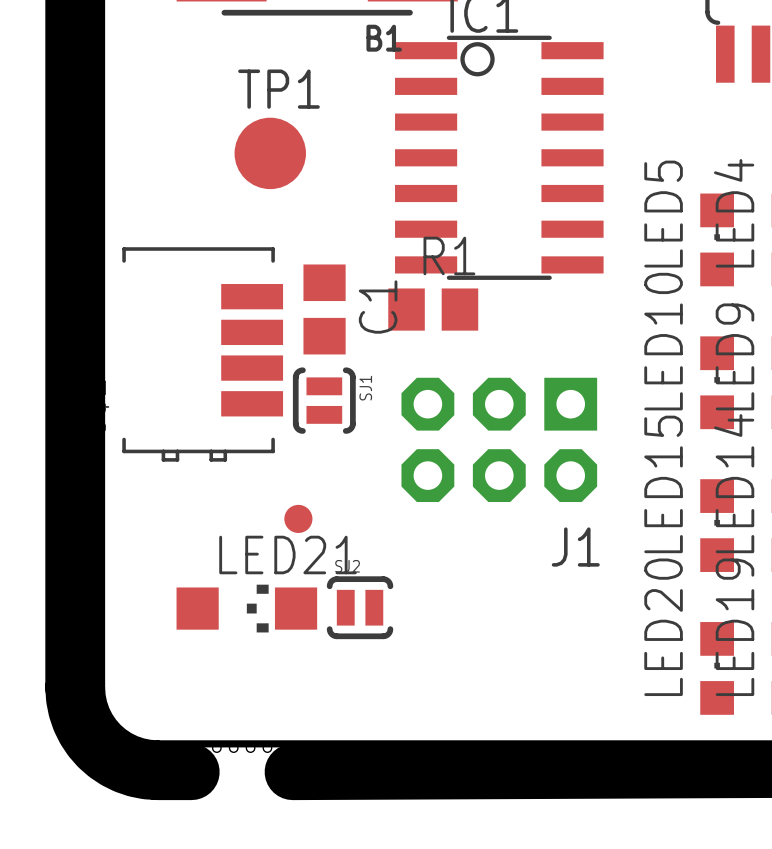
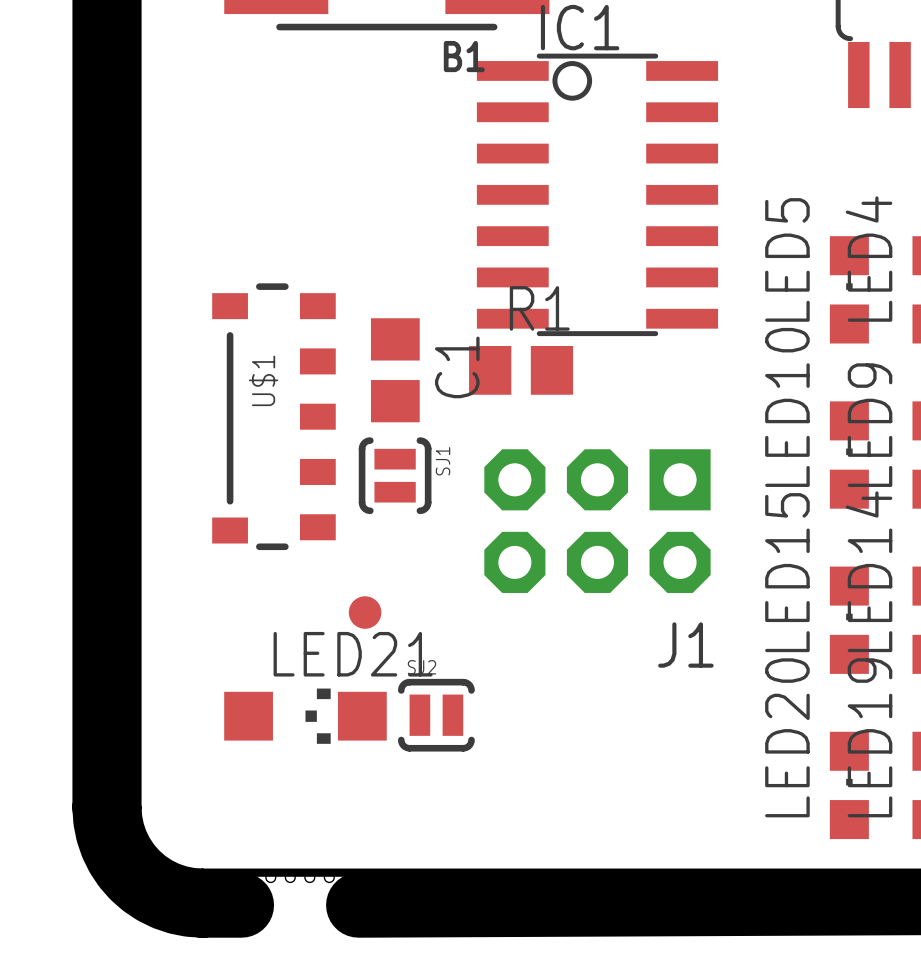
TP1: (270, 153) -> none
U$1: none -> (273, 416)
part: (202, 354) -> none

